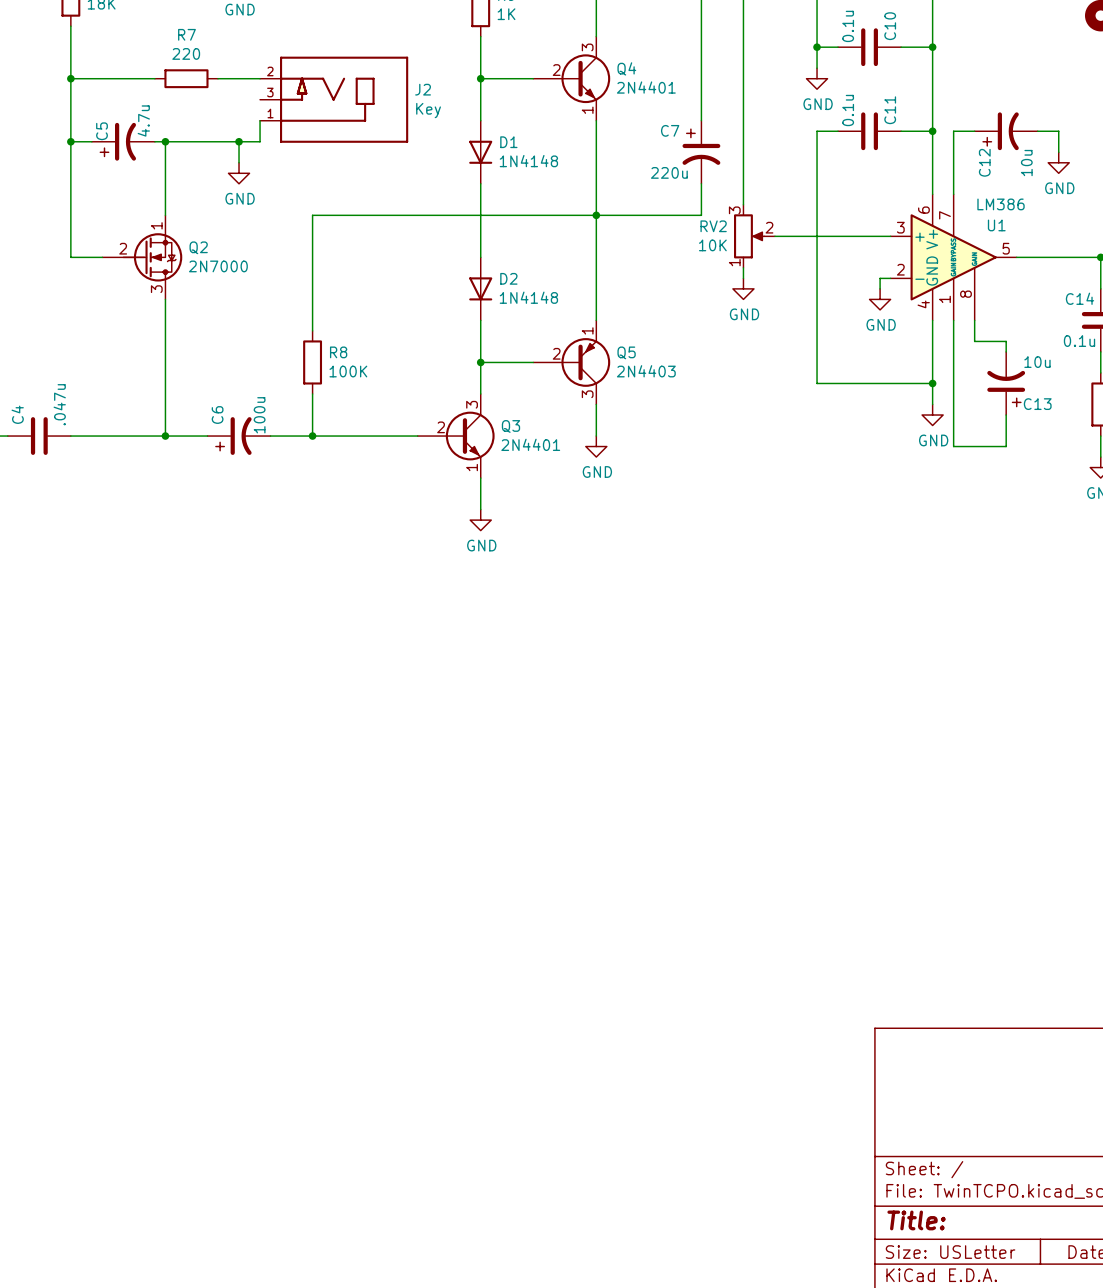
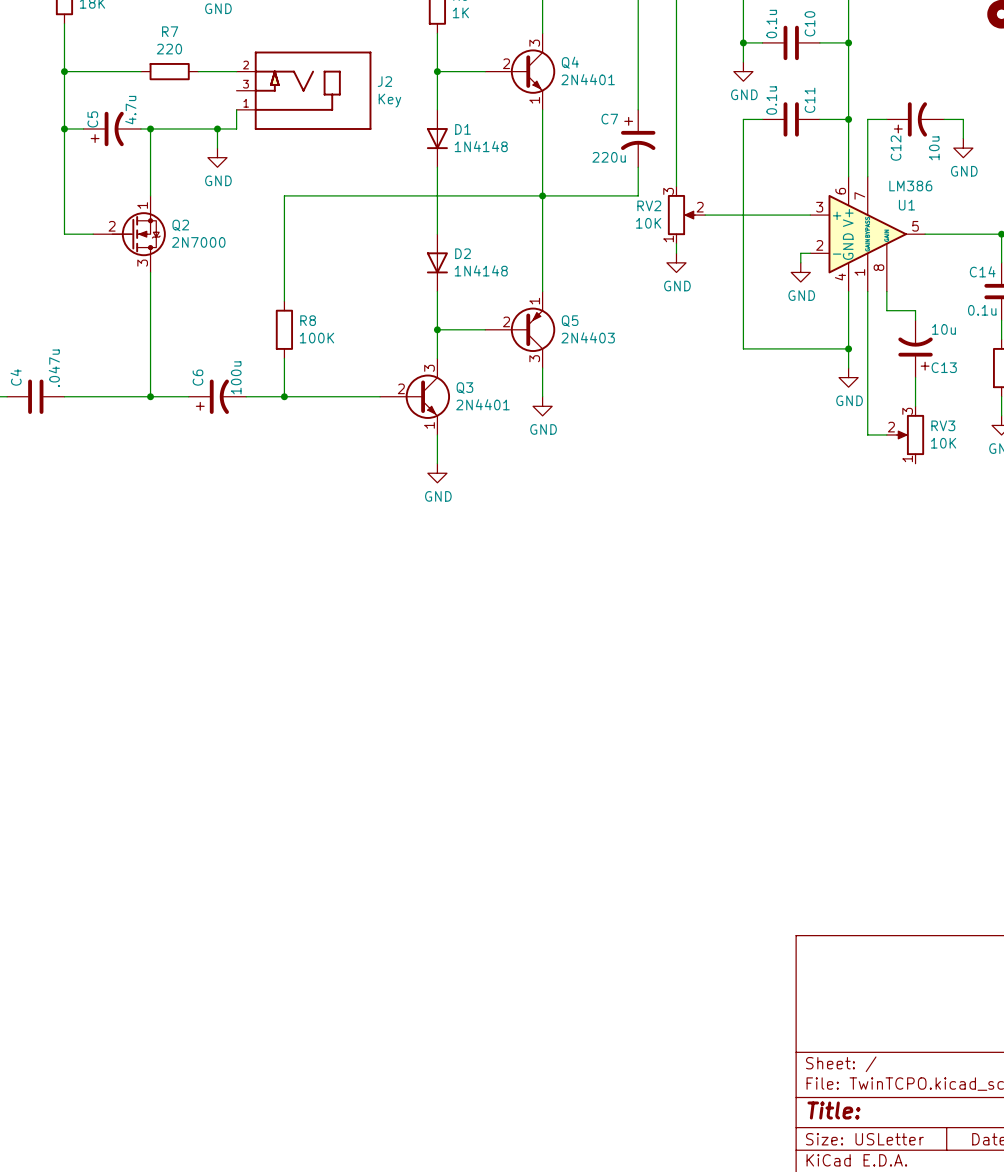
wire: (953, 446) (1006, 446) -> (867, 406) (867, 434) (886, 434)
RV3: none -> 10K (905, 434)

